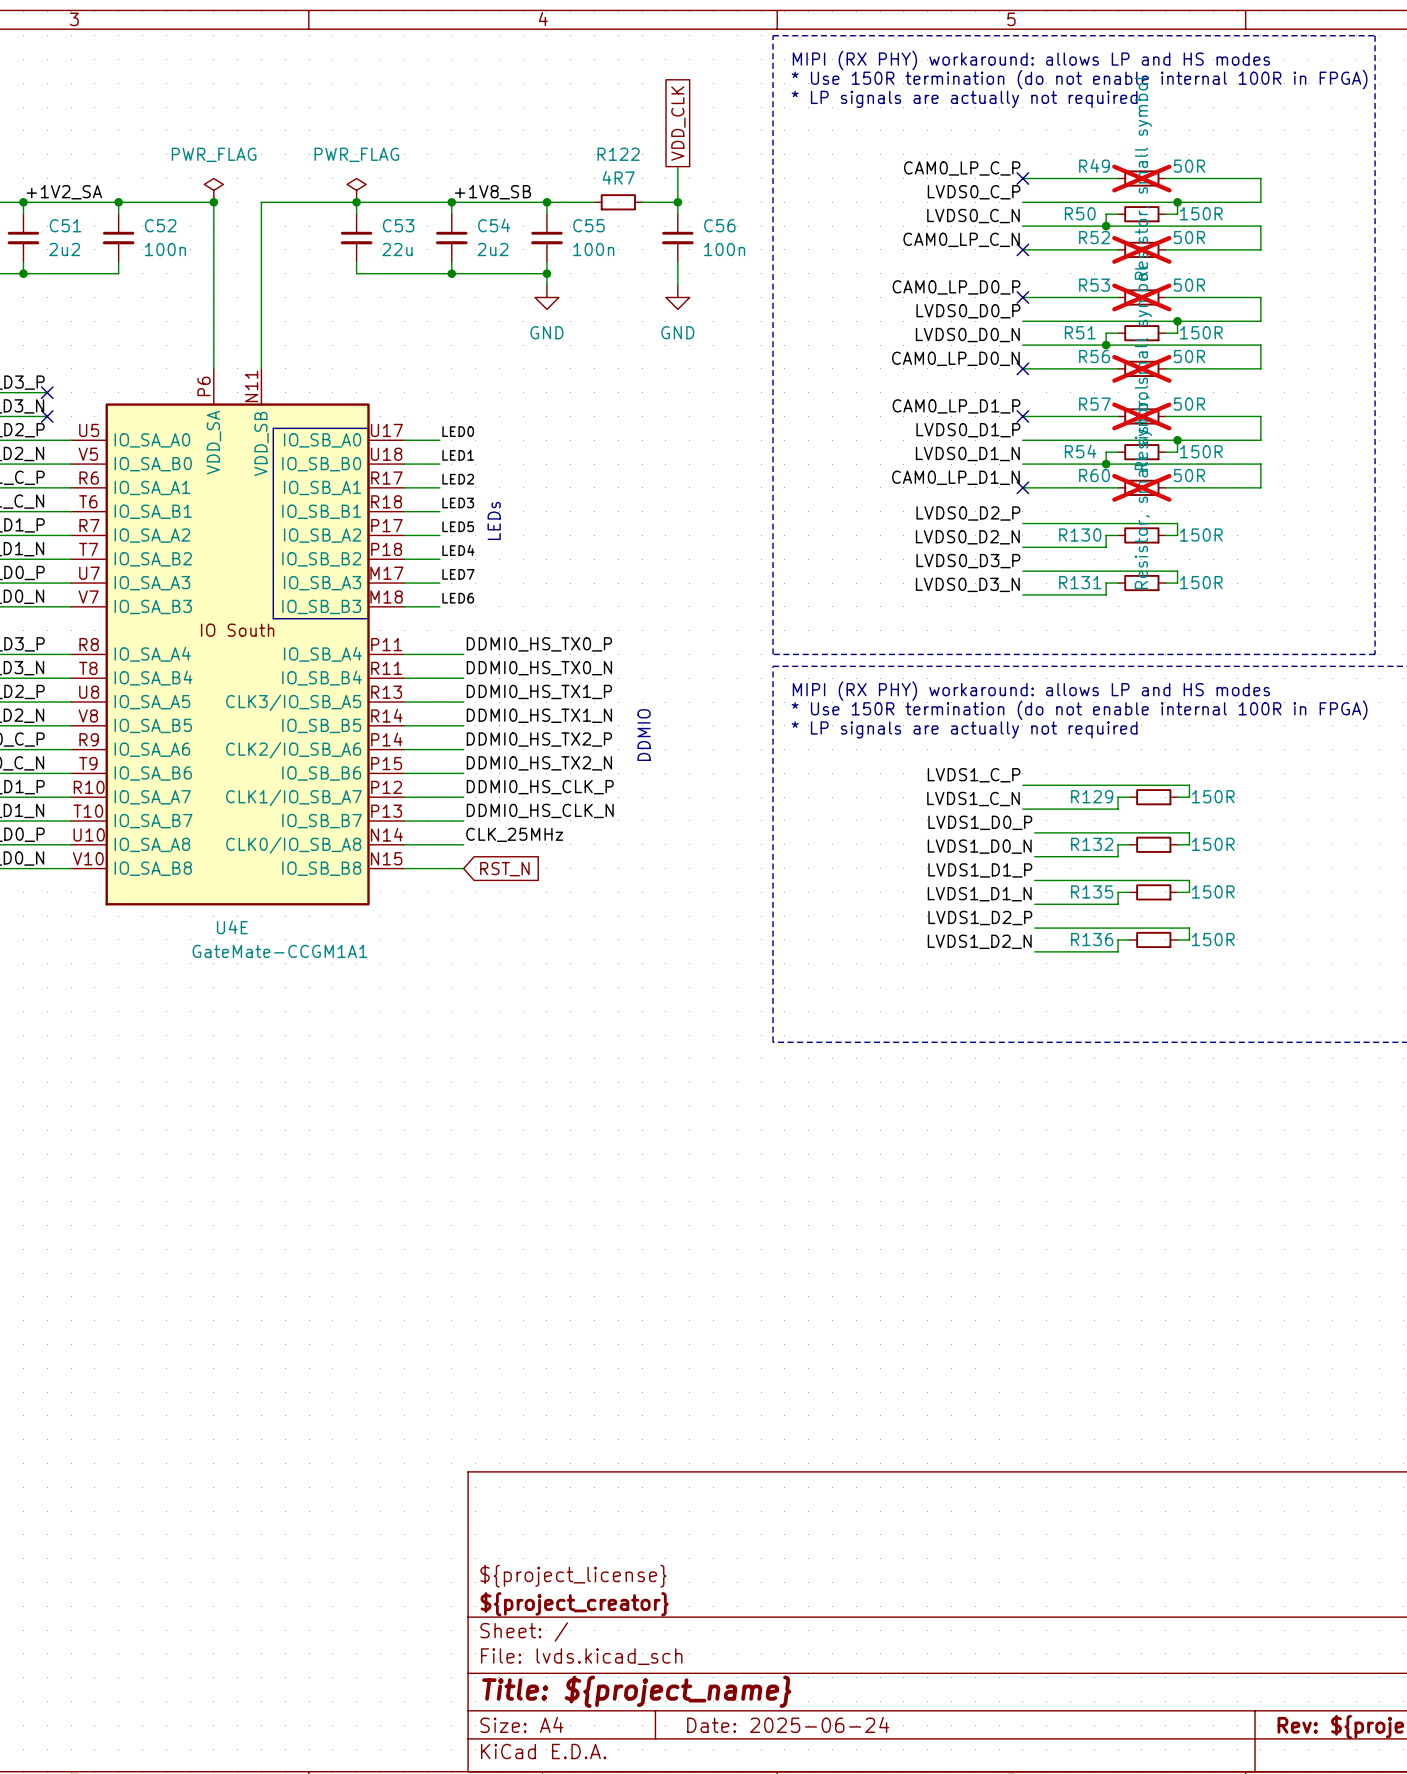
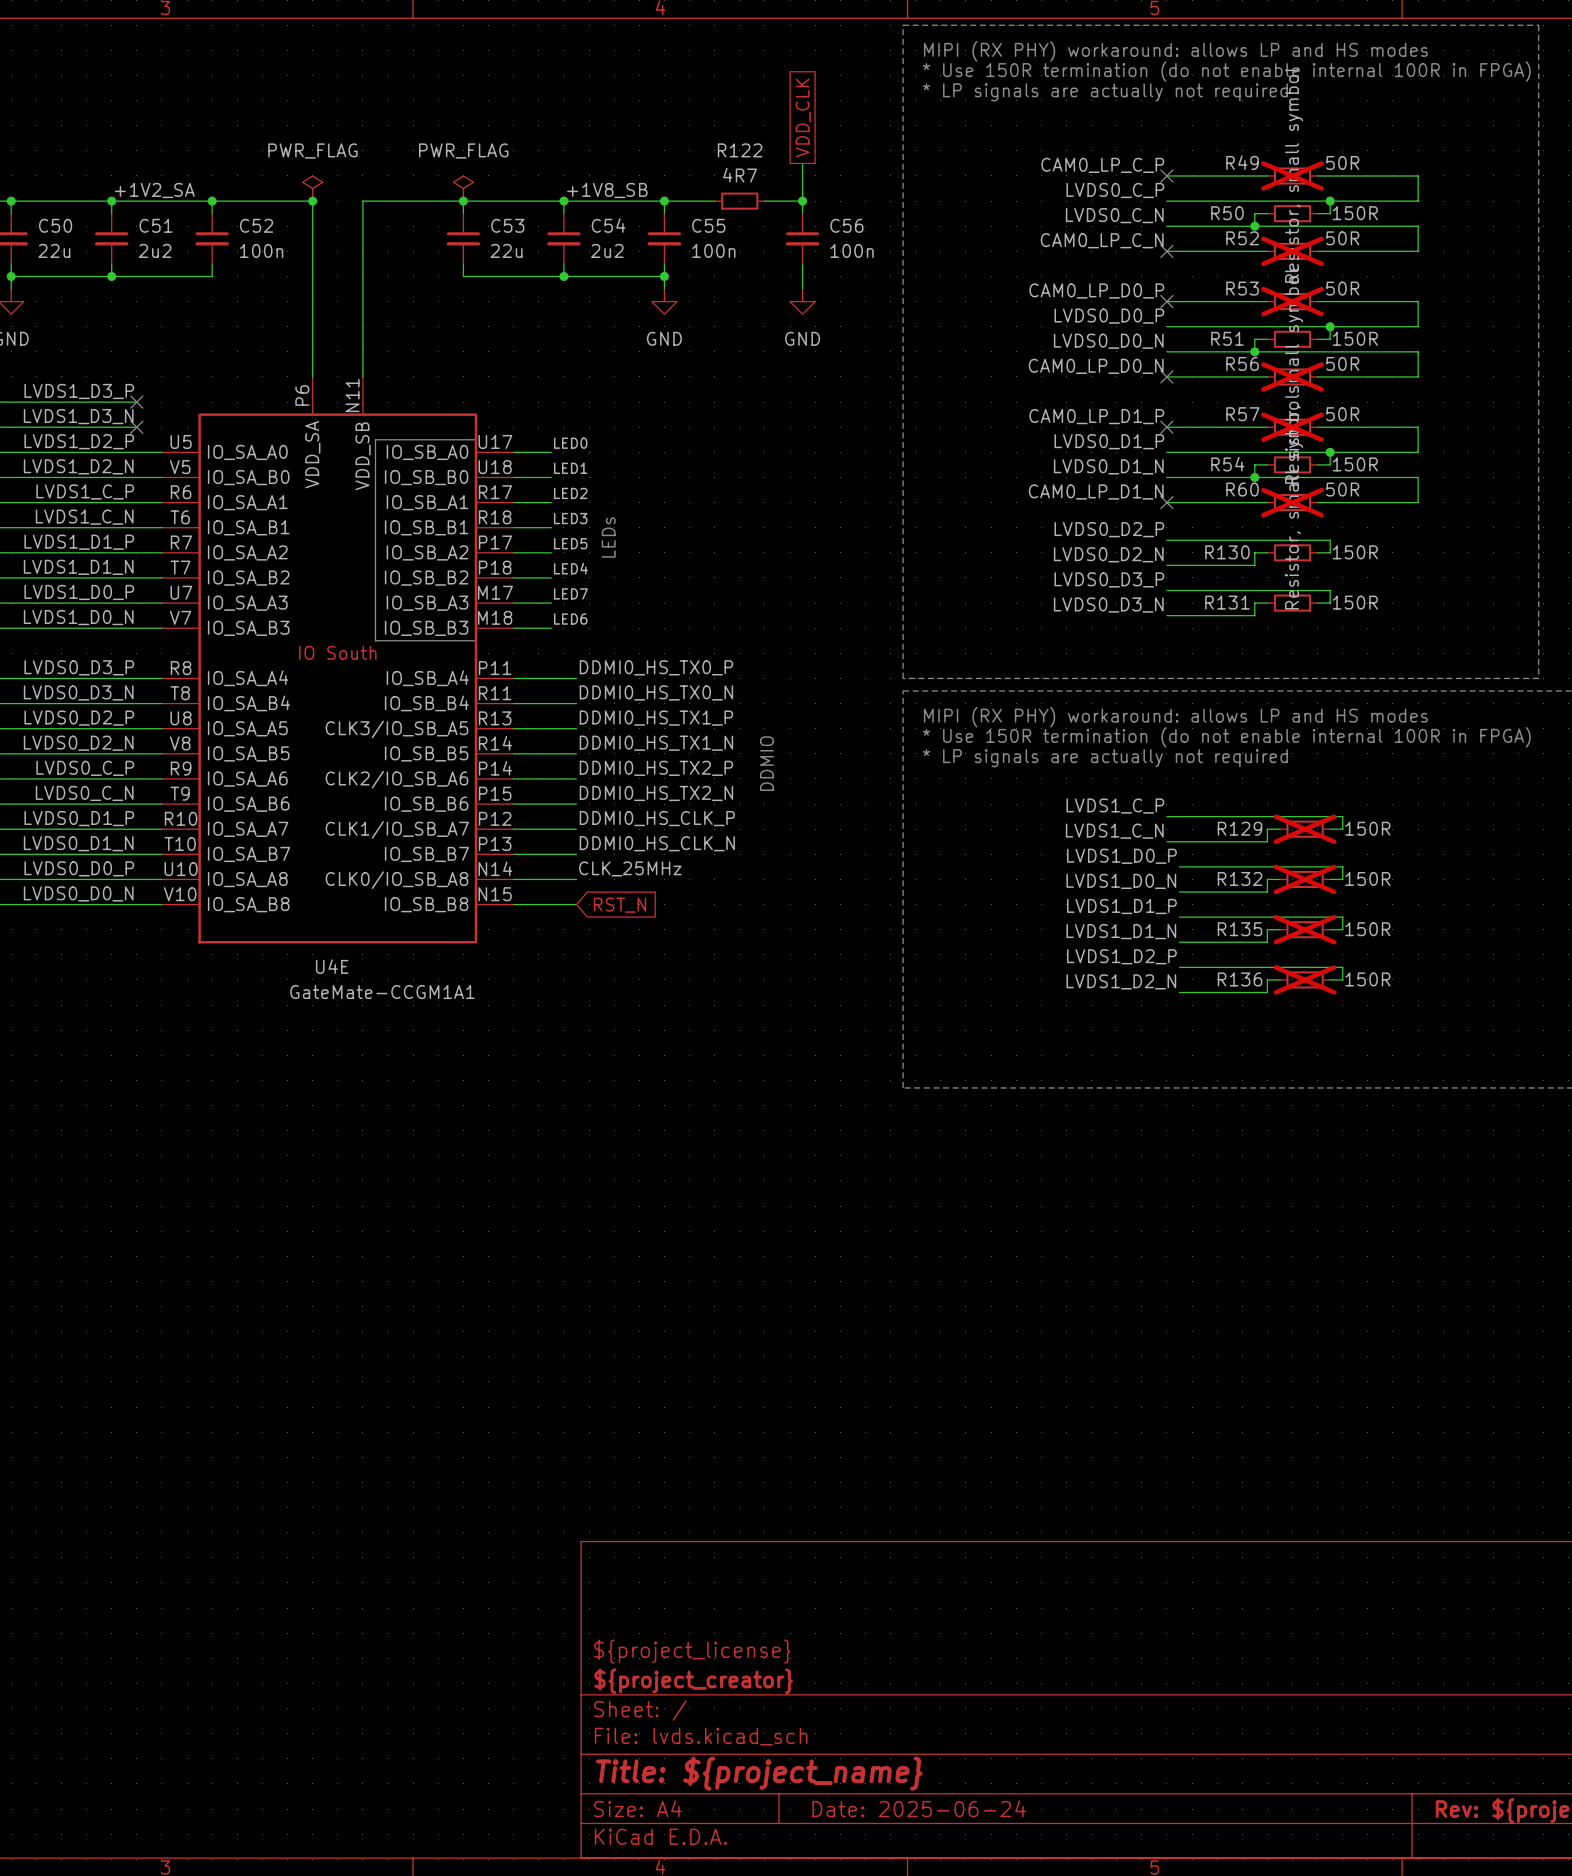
R129 do-not-place cross: none -> (1305, 829)
R132 do-not-place cross: none -> (1305, 879)
R135 do-not-place cross: none -> (1305, 929)
R136 do-not-place cross: none -> (1305, 979)

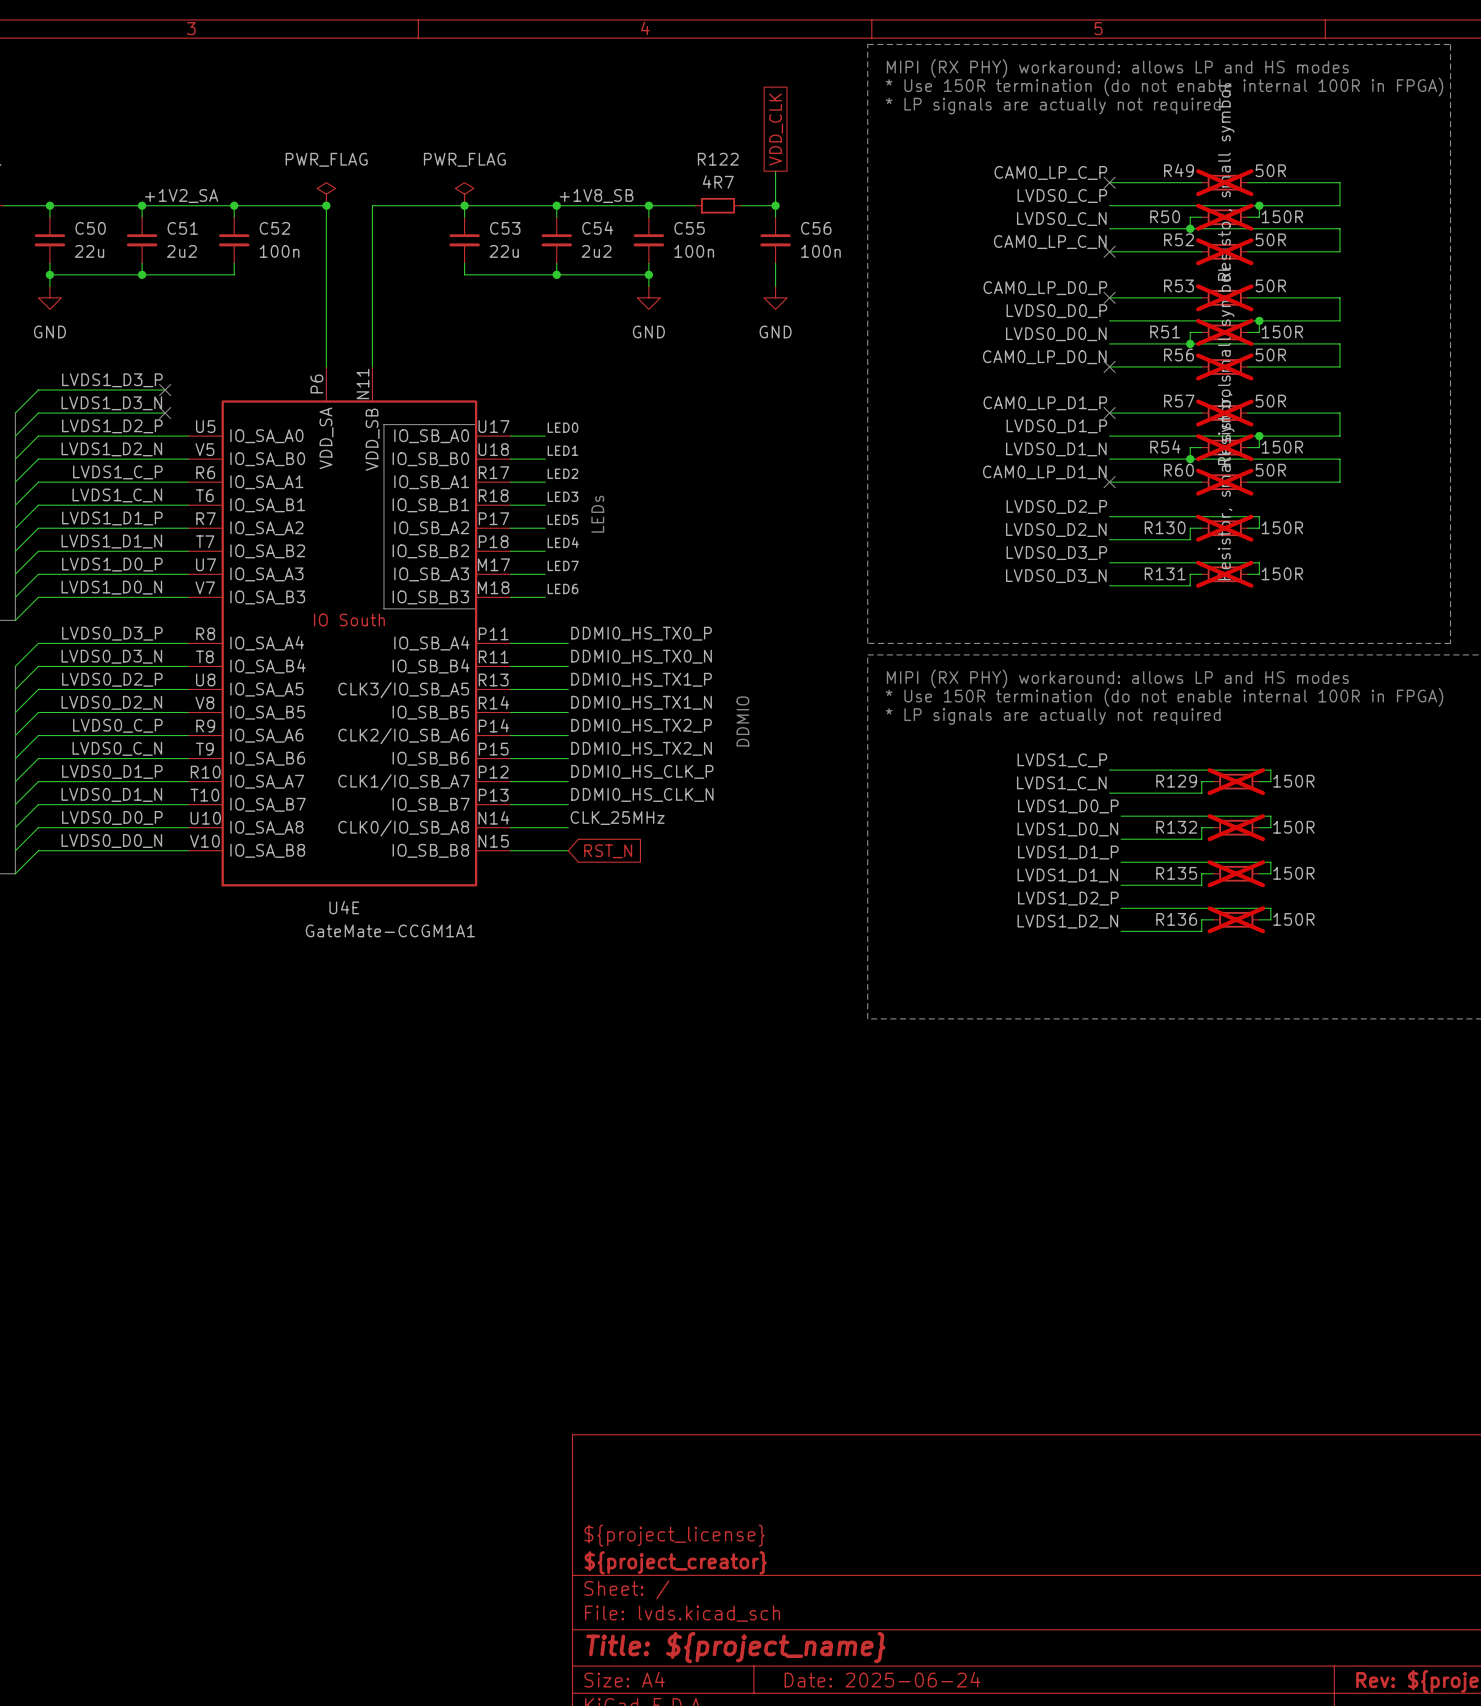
R50 do-not-place cross: none -> (1224, 217)
R51 do-not-place cross: none -> (1224, 332)
R54 do-not-place cross: none -> (1224, 447)
R130 do-not-place cross: none -> (1224, 528)
R131 do-not-place cross: none -> (1224, 574)

